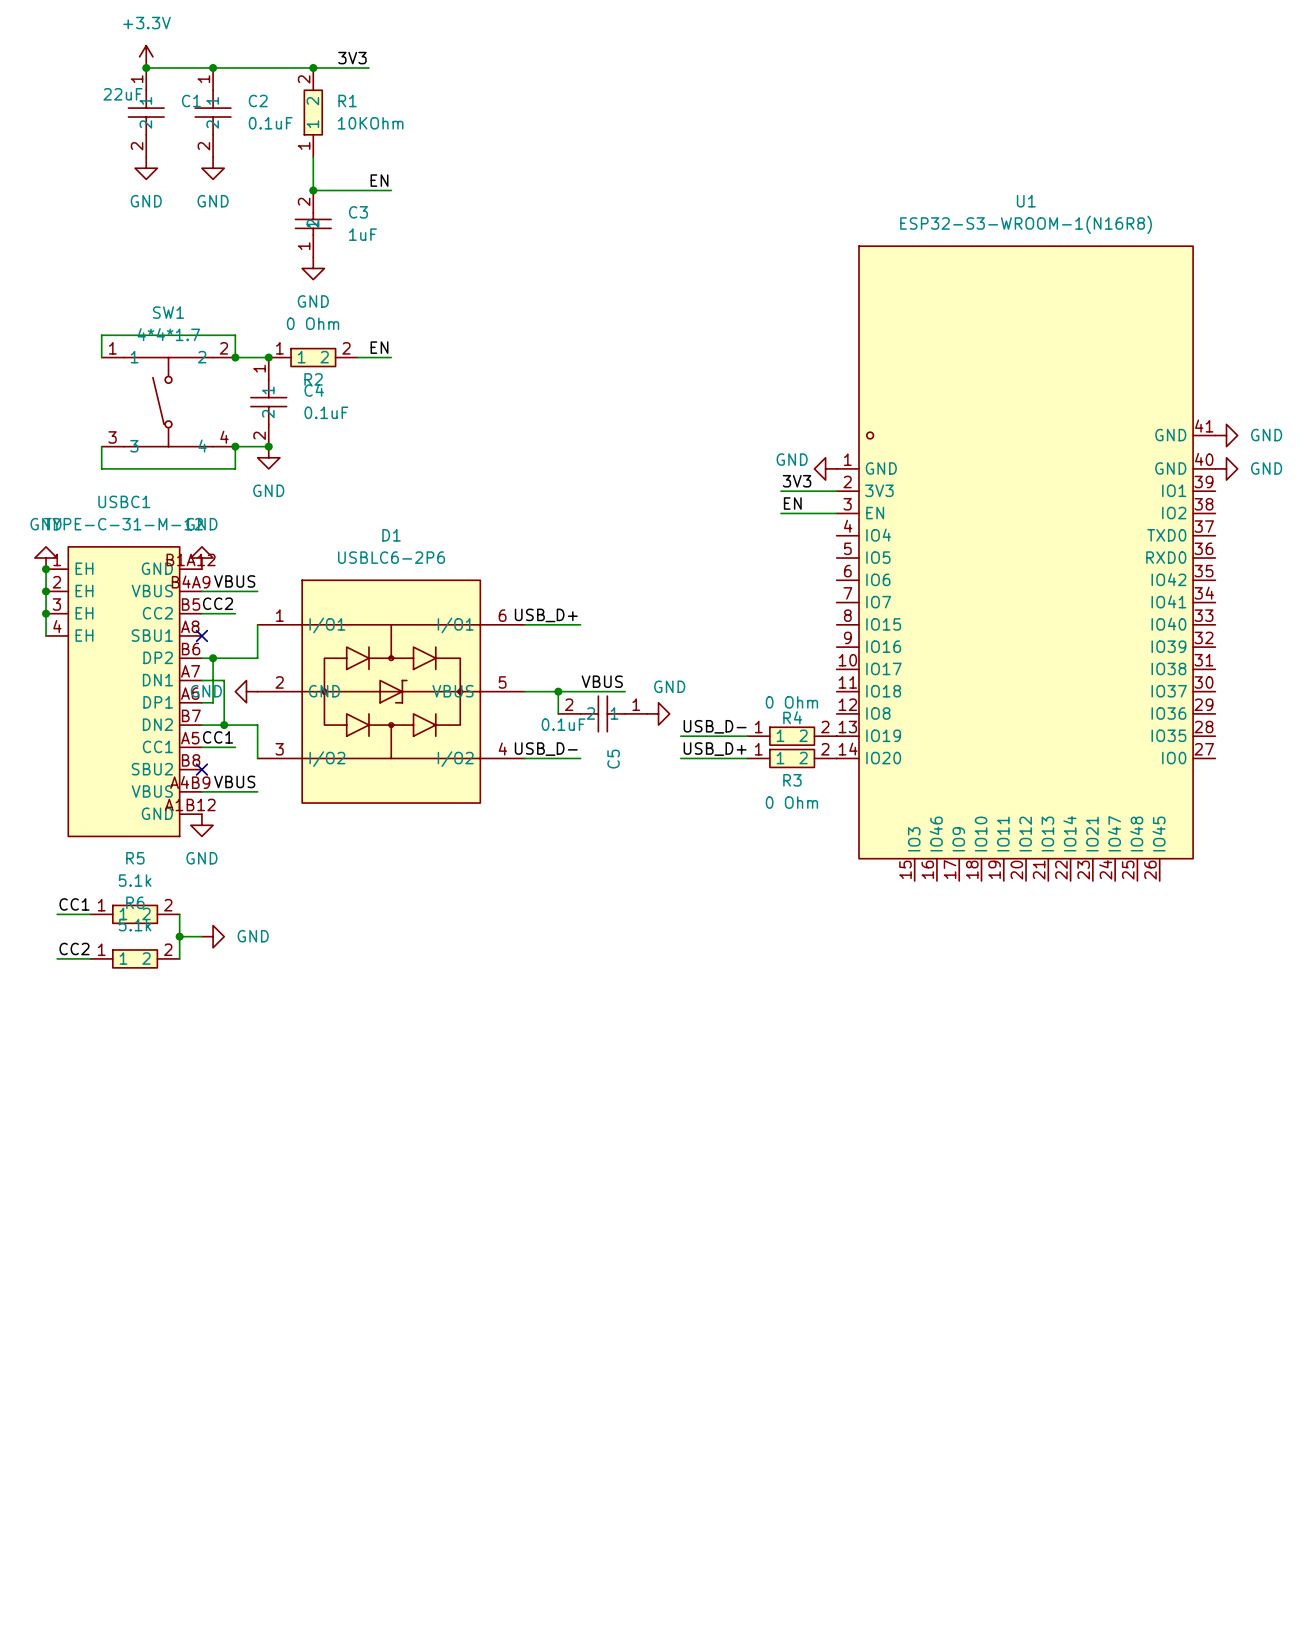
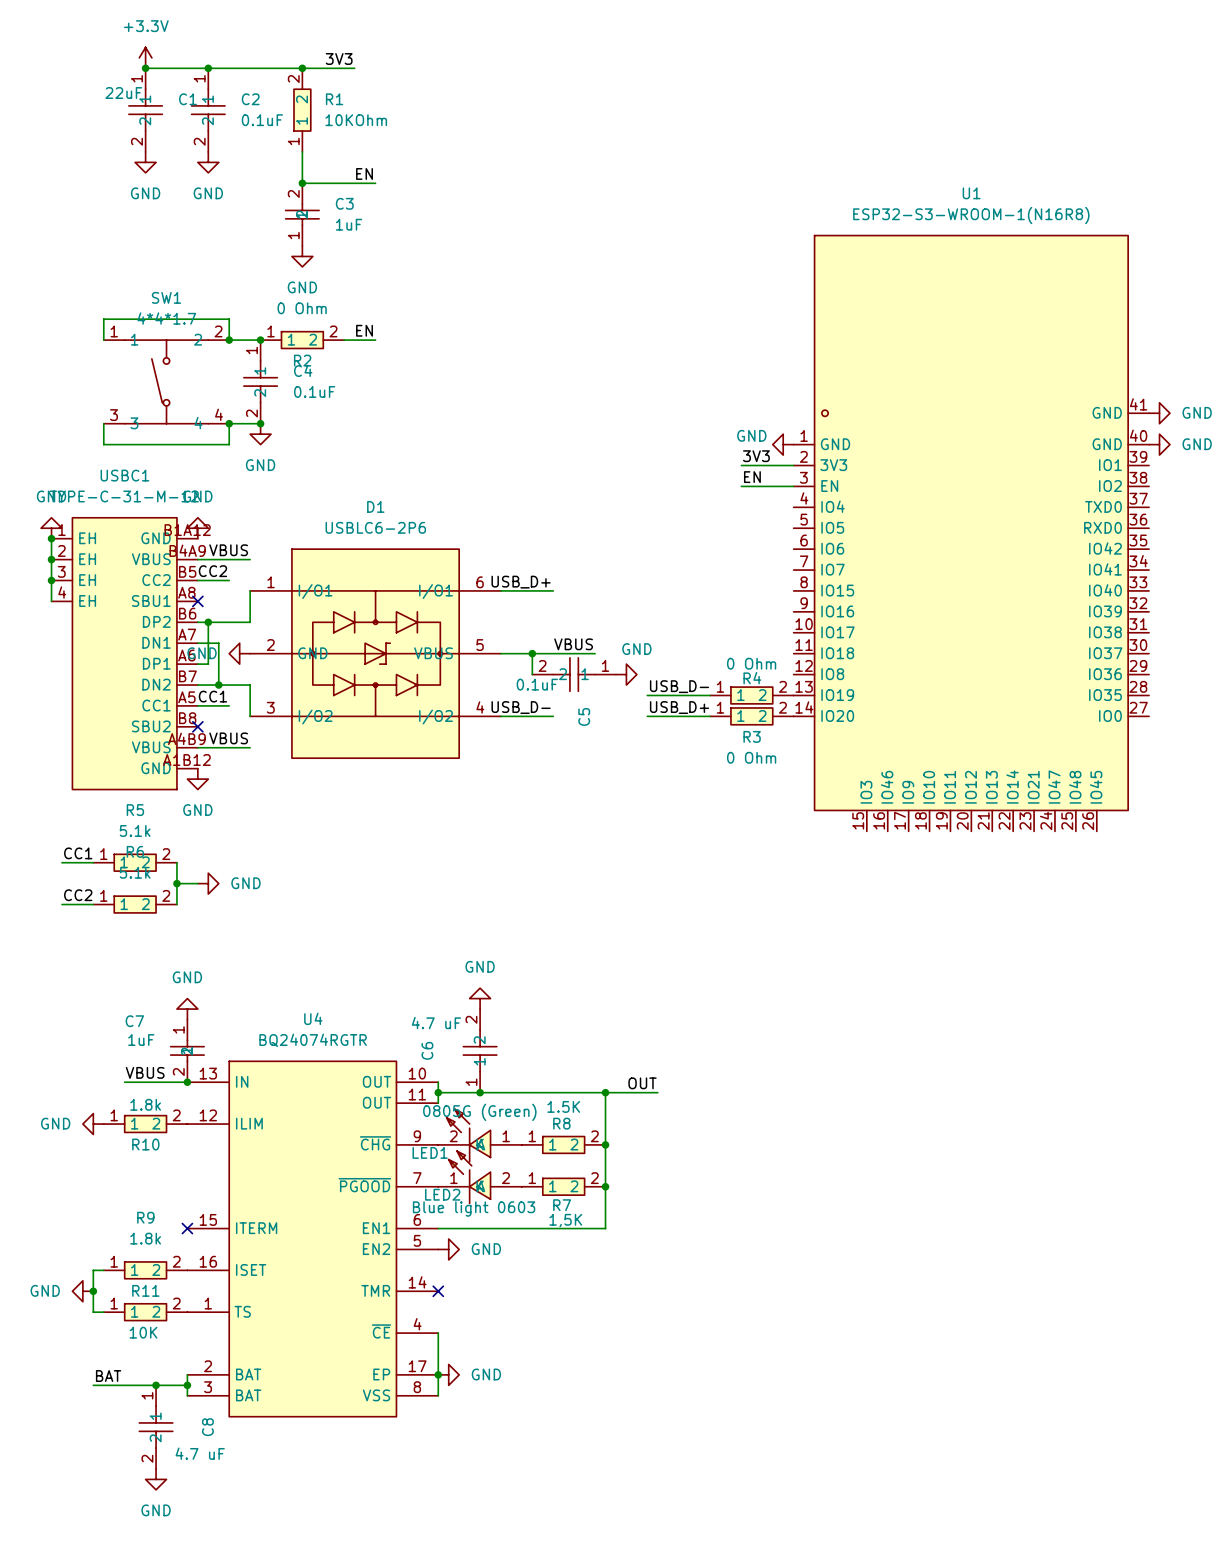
power symbol: none -> GND (480, 998)
power symbol: none -> GND (187, 1009)
C7: none -> 1uF (187, 1050)
C6: none -> 4.7 uF (480, 1050)
label: none -> VBUS (145, 1072)
wire: none -> (124, 1082) (187, 1082)
junction: none -> (187, 1082)
wire: none -> (438, 1082) (438, 1103)
label: none -> OUT (642, 1083)
wire: none -> (438, 1092) (657, 1092)
junction: none -> (438, 1092)
junction: none -> (480, 1092)
wire: none -> (605, 1092) (605, 1228) (438, 1228)
junction: none -> (605, 1092)
power symbol: none -> GND (93, 1124)
R10: none -> 1.8k (145, 1124)
LED1: none -> 0805G (Green) (480, 1135)
R8: none -> 1.5K (563, 1144)
junction: none -> (605, 1144)
LED2: none -> Blue light 0603 (480, 1177)
R7: none -> 1,5K (563, 1186)
junction: none -> (605, 1186)
no-connect mark: none -> (187, 1228)
U4: none -> BQ24074RGTR (312, 1239)
power symbol: none -> GND (448, 1249)
wire: none -> (103, 1270) (93, 1270) (93, 1312) (103, 1312)
R9: none -> 1.8k (145, 1270)
power symbol: none -> GND (82, 1291)
junction: none -> (93, 1291)
no-connect mark: none -> (438, 1291)
R11: none -> 10K (145, 1312)
wire: none -> (438, 1333) (438, 1395)
wire: none -> (187, 1374) (187, 1395)
junction: none -> (438, 1374)
power symbol: none -> GND (448, 1374)
label: none -> BAT (108, 1376)
wire: none -> (93, 1385) (187, 1385)
junction: none -> (156, 1385)
junction: none -> (187, 1385)
C8: none -> 4.7 uF (156, 1427)
power symbol: none -> GND (156, 1479)

